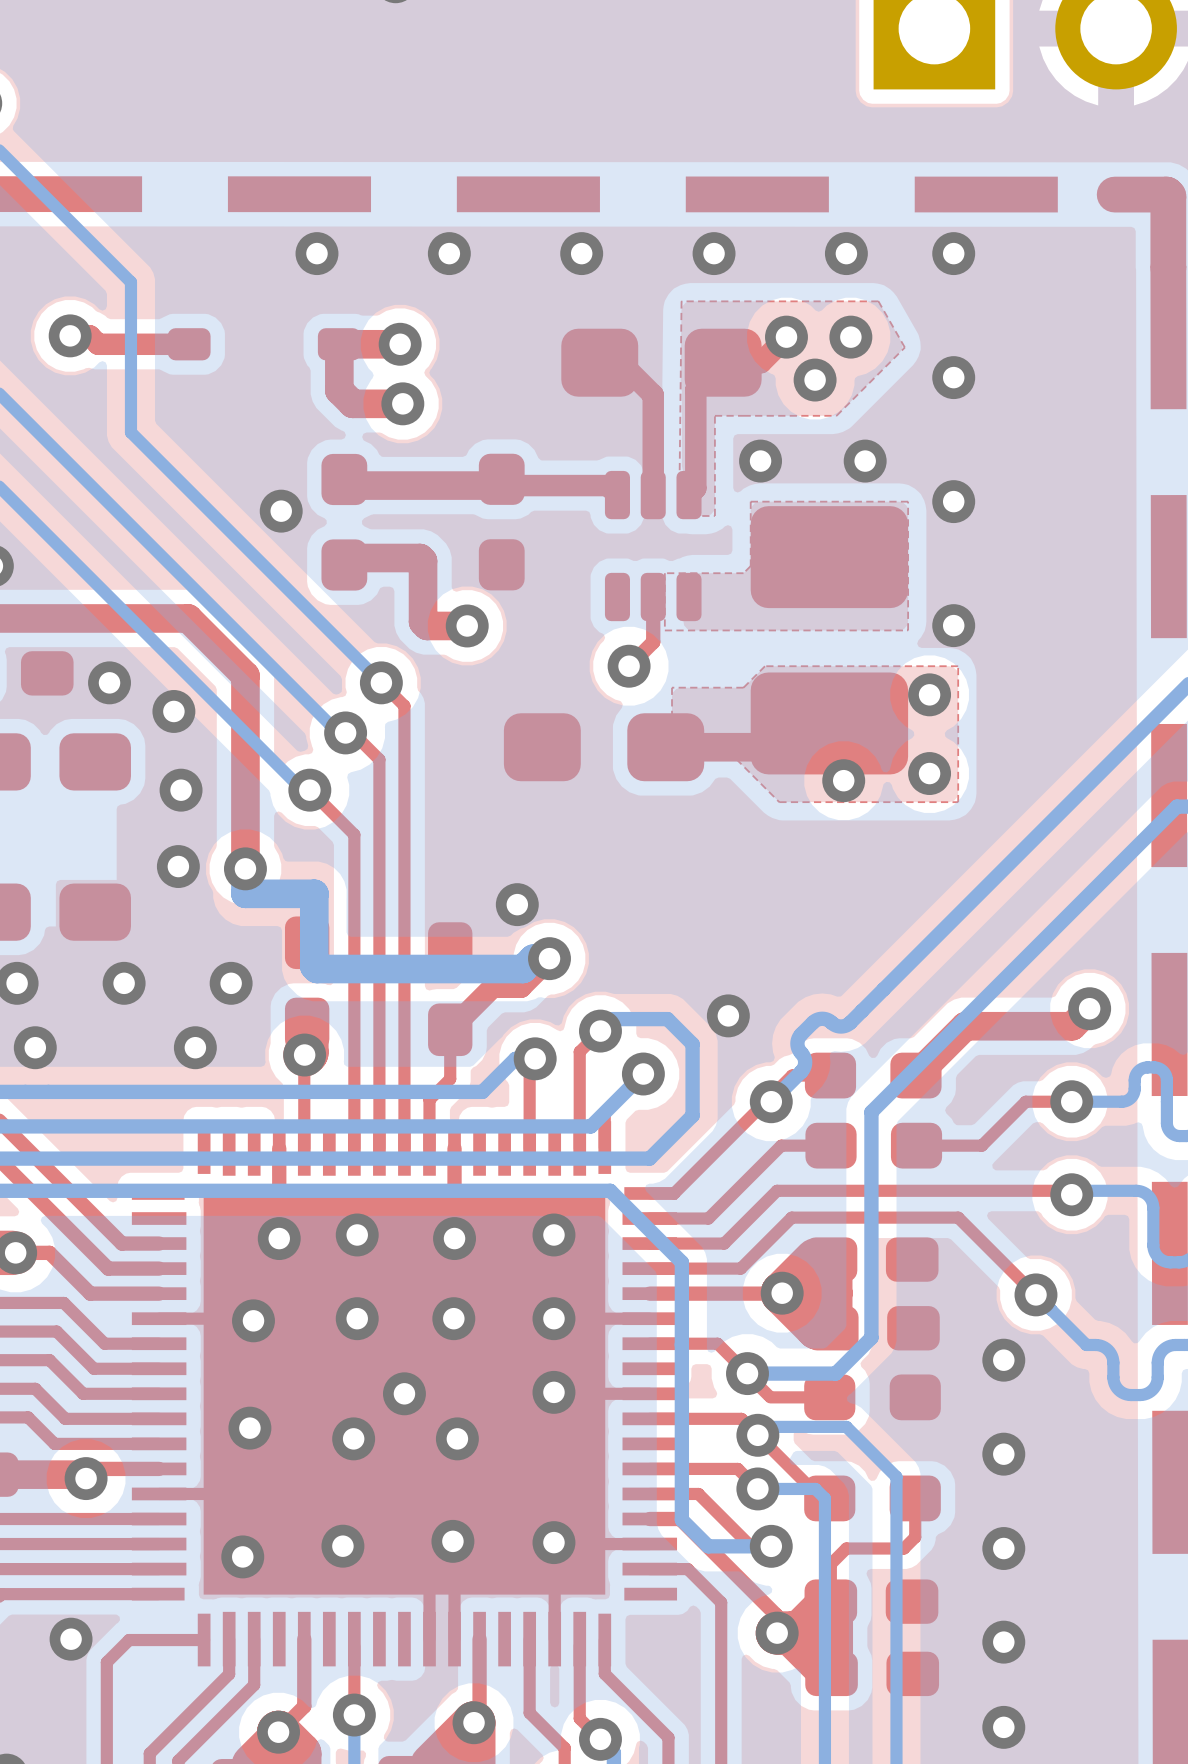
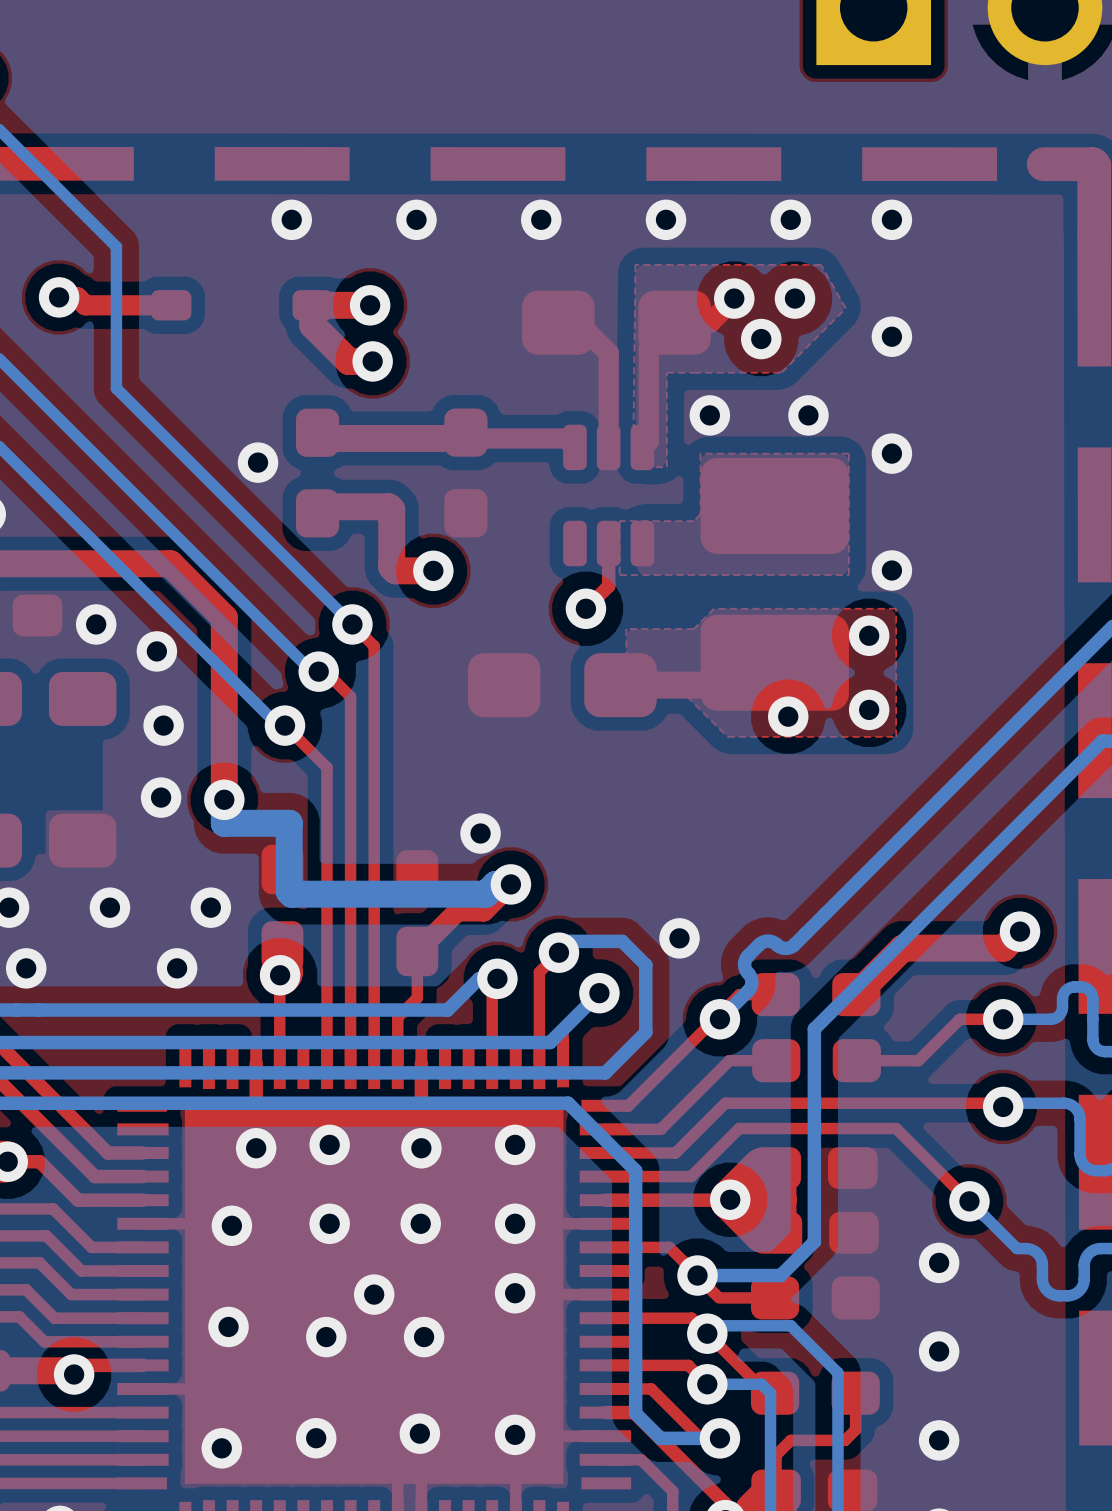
top track: (339, 365) (339, 390) (352, 403) (377, 403) -> (312, 325) (348, 361)

